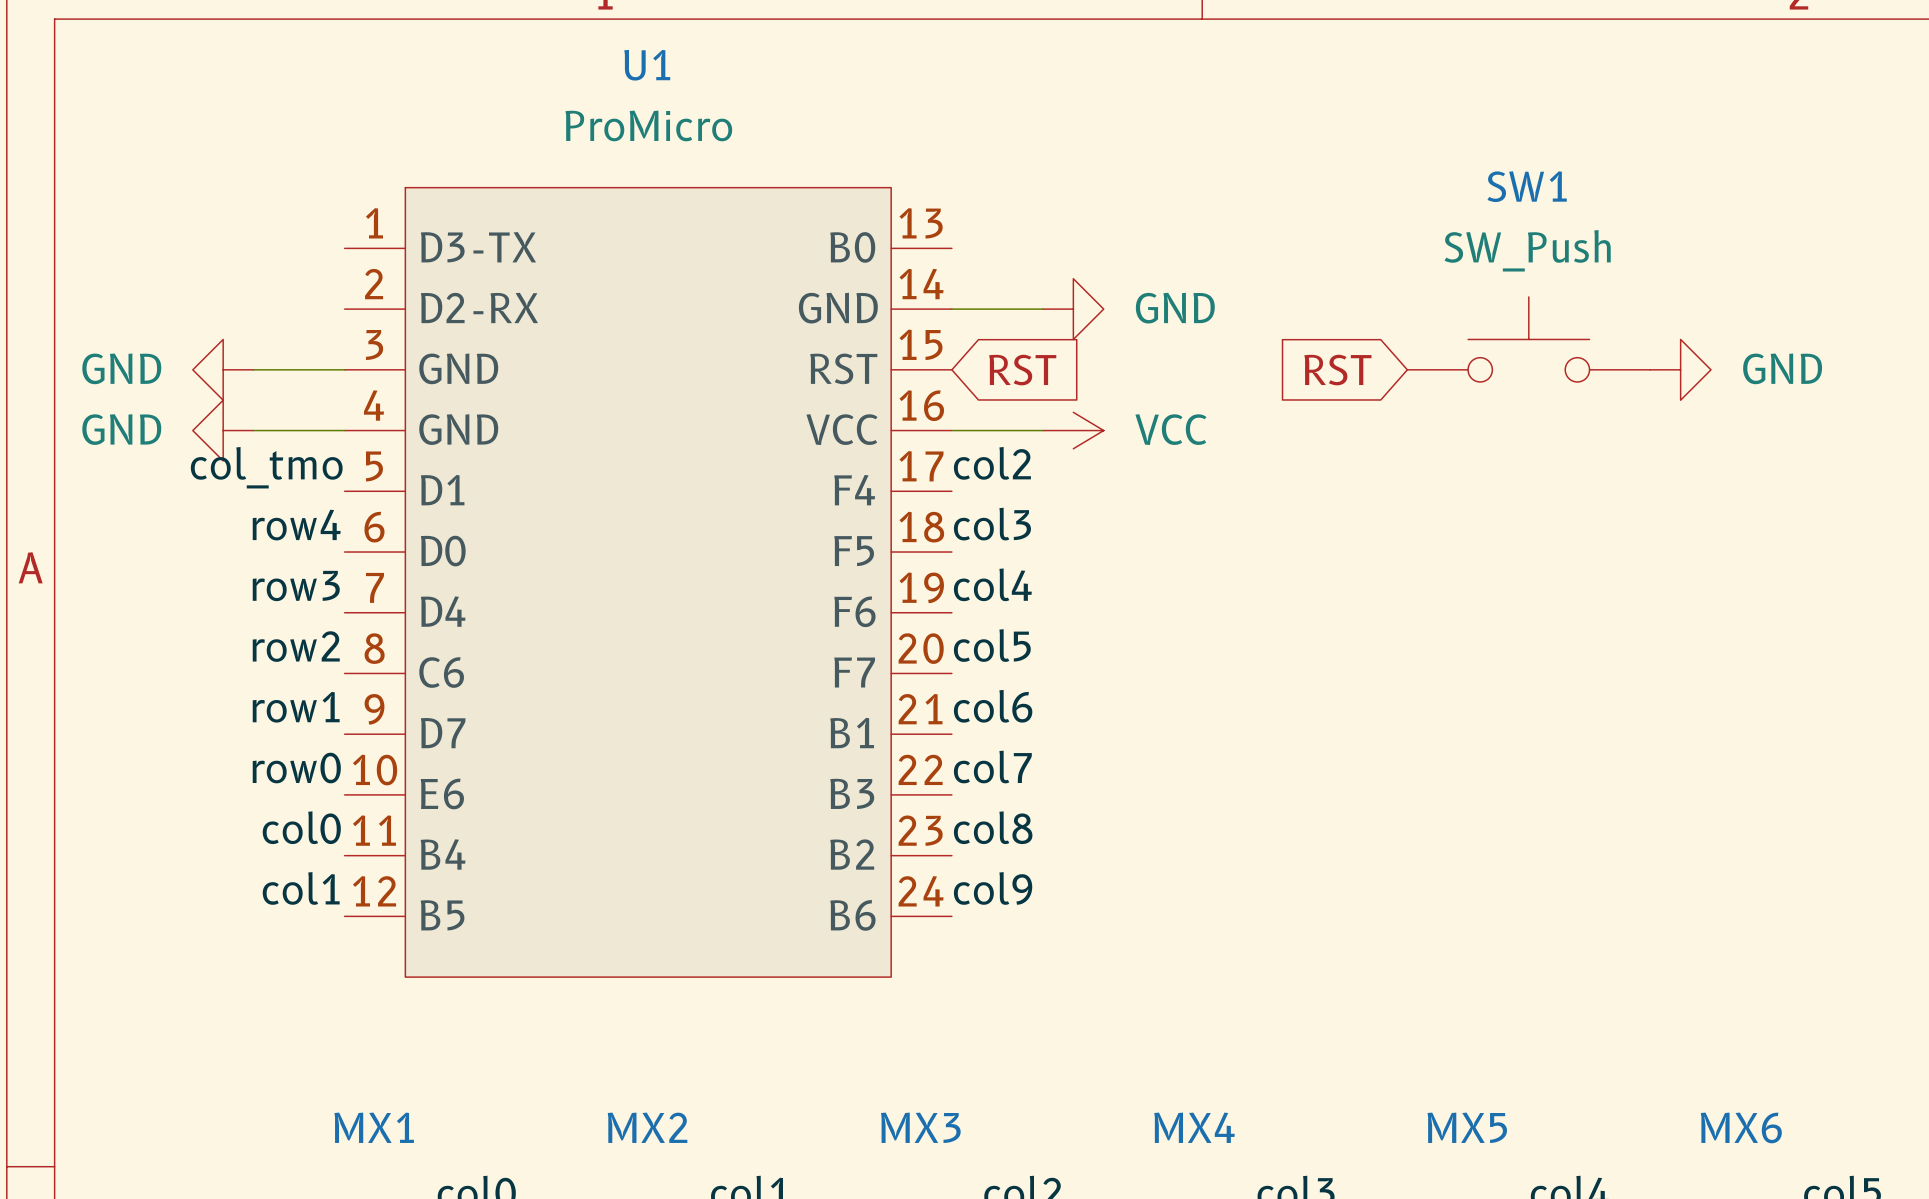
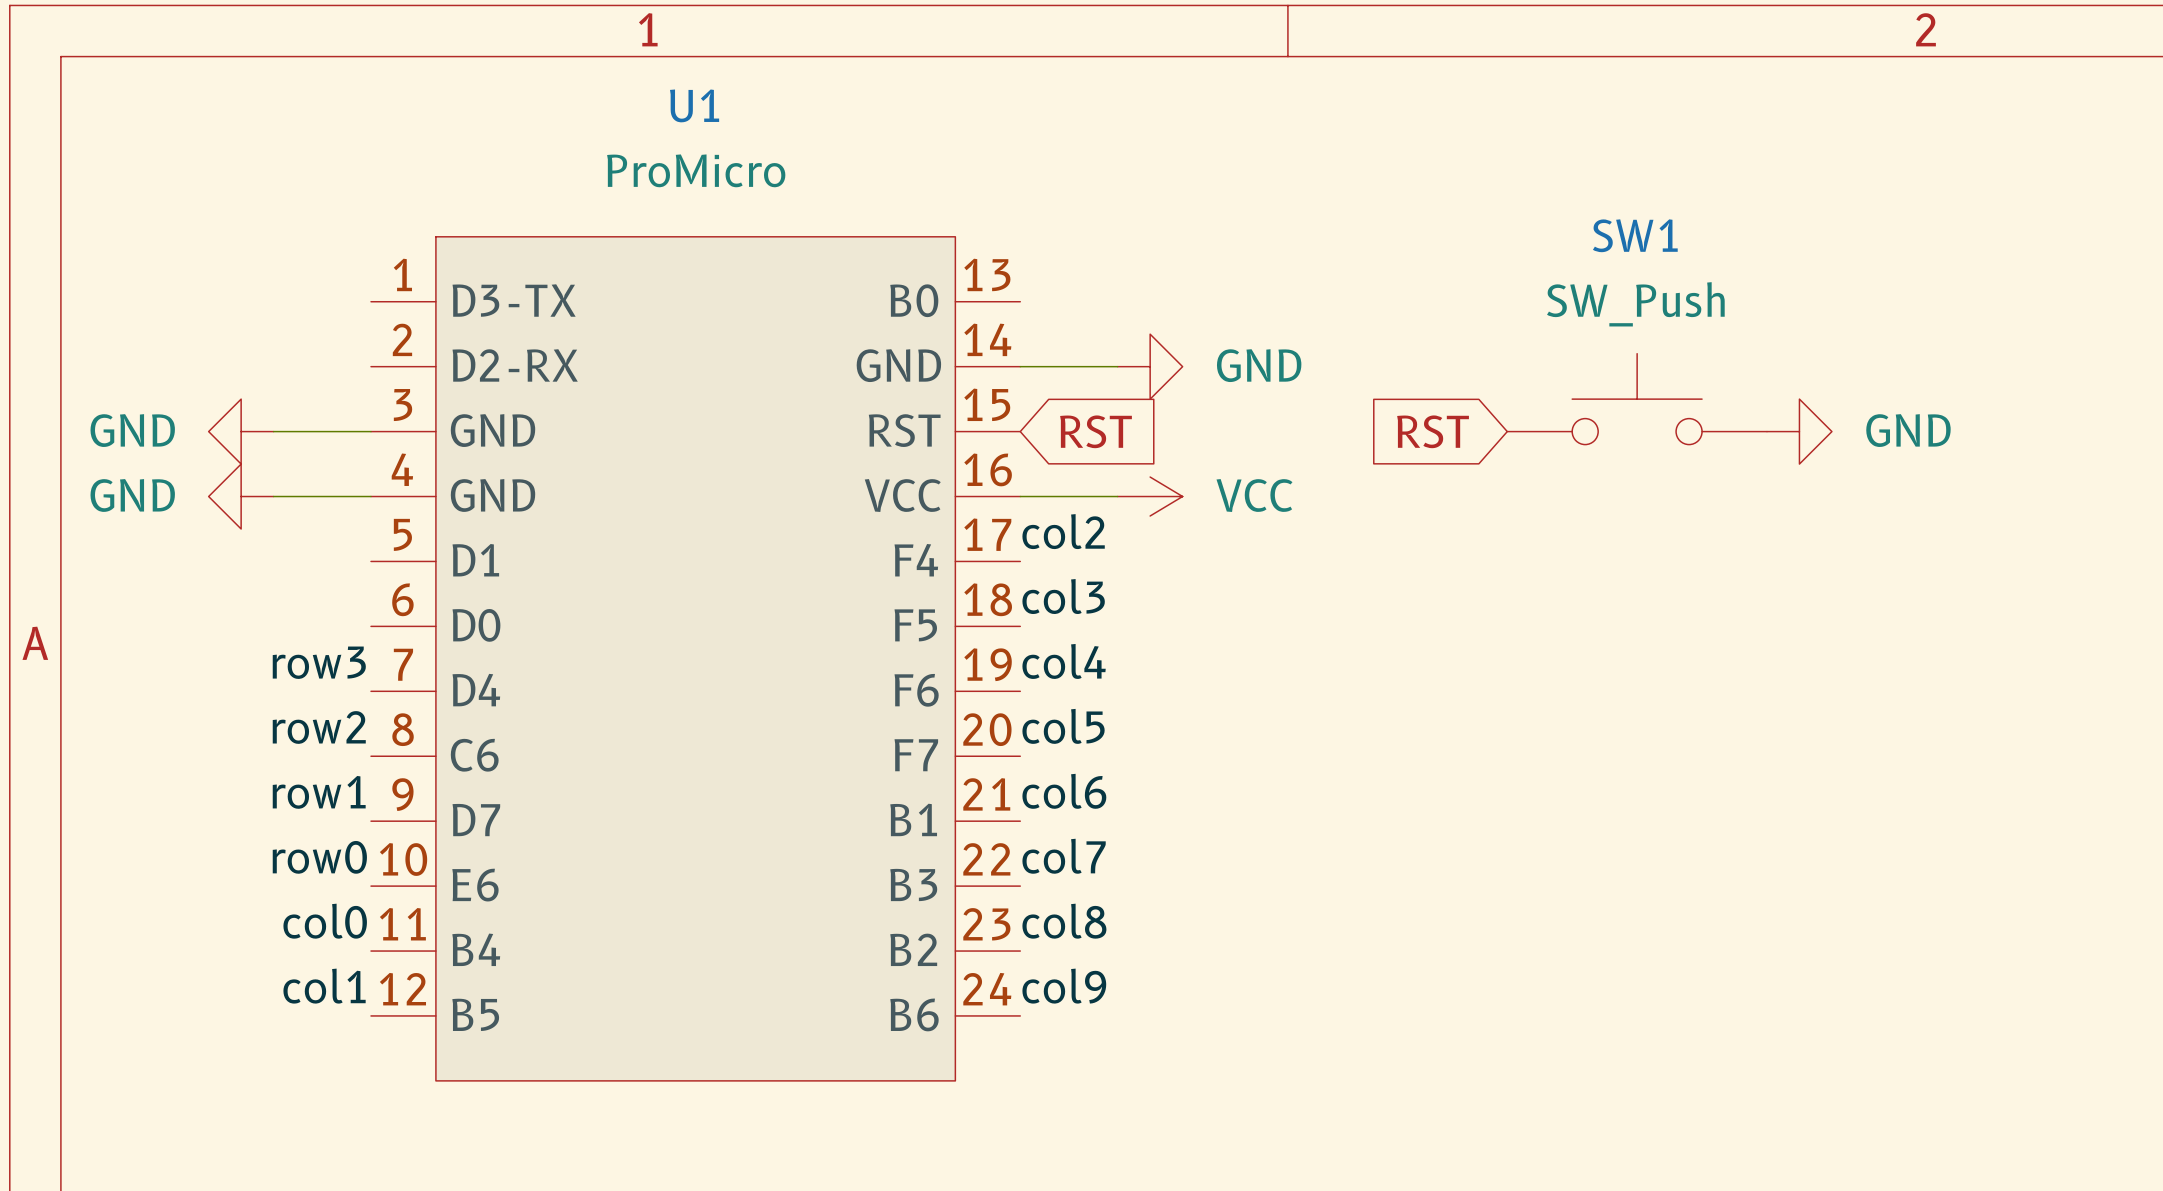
label: col_tmo (266, 467) -> none
label: row4 (296, 525) -> none

